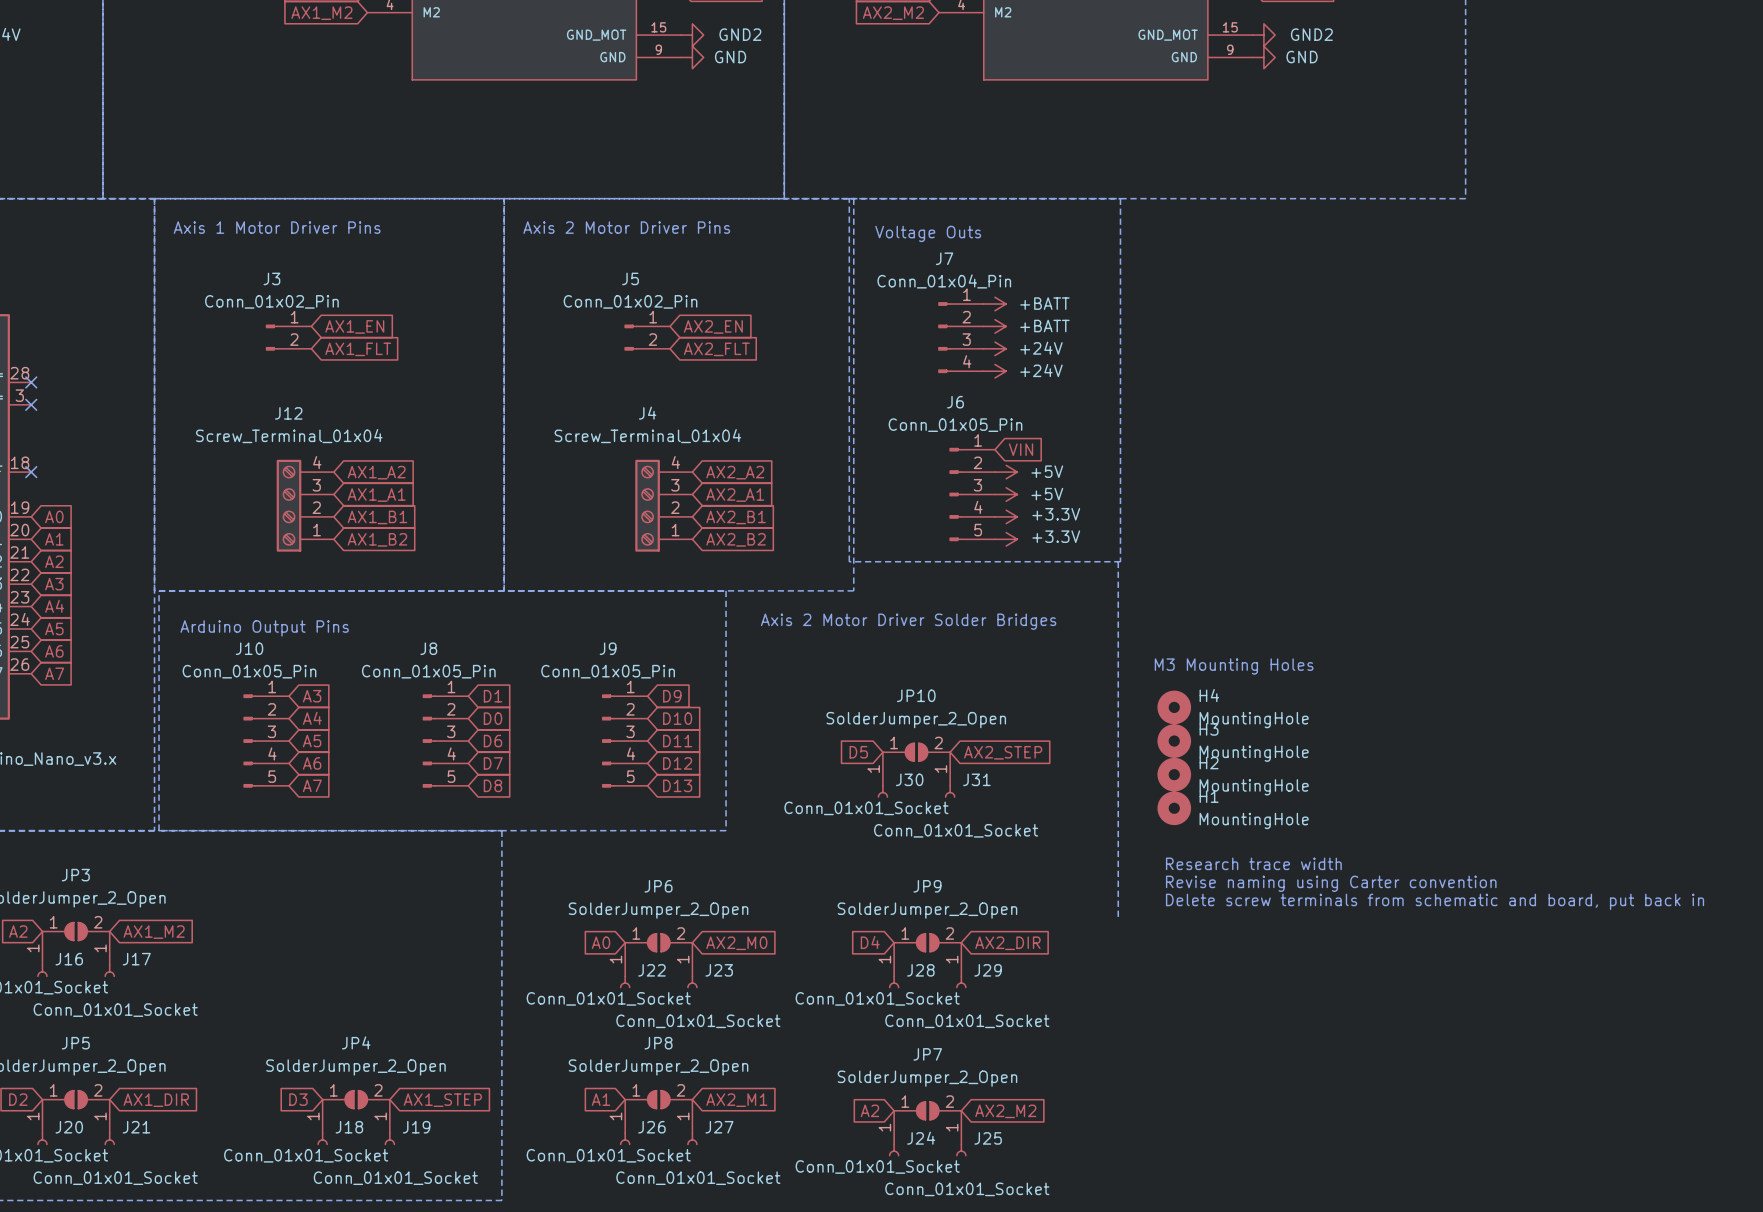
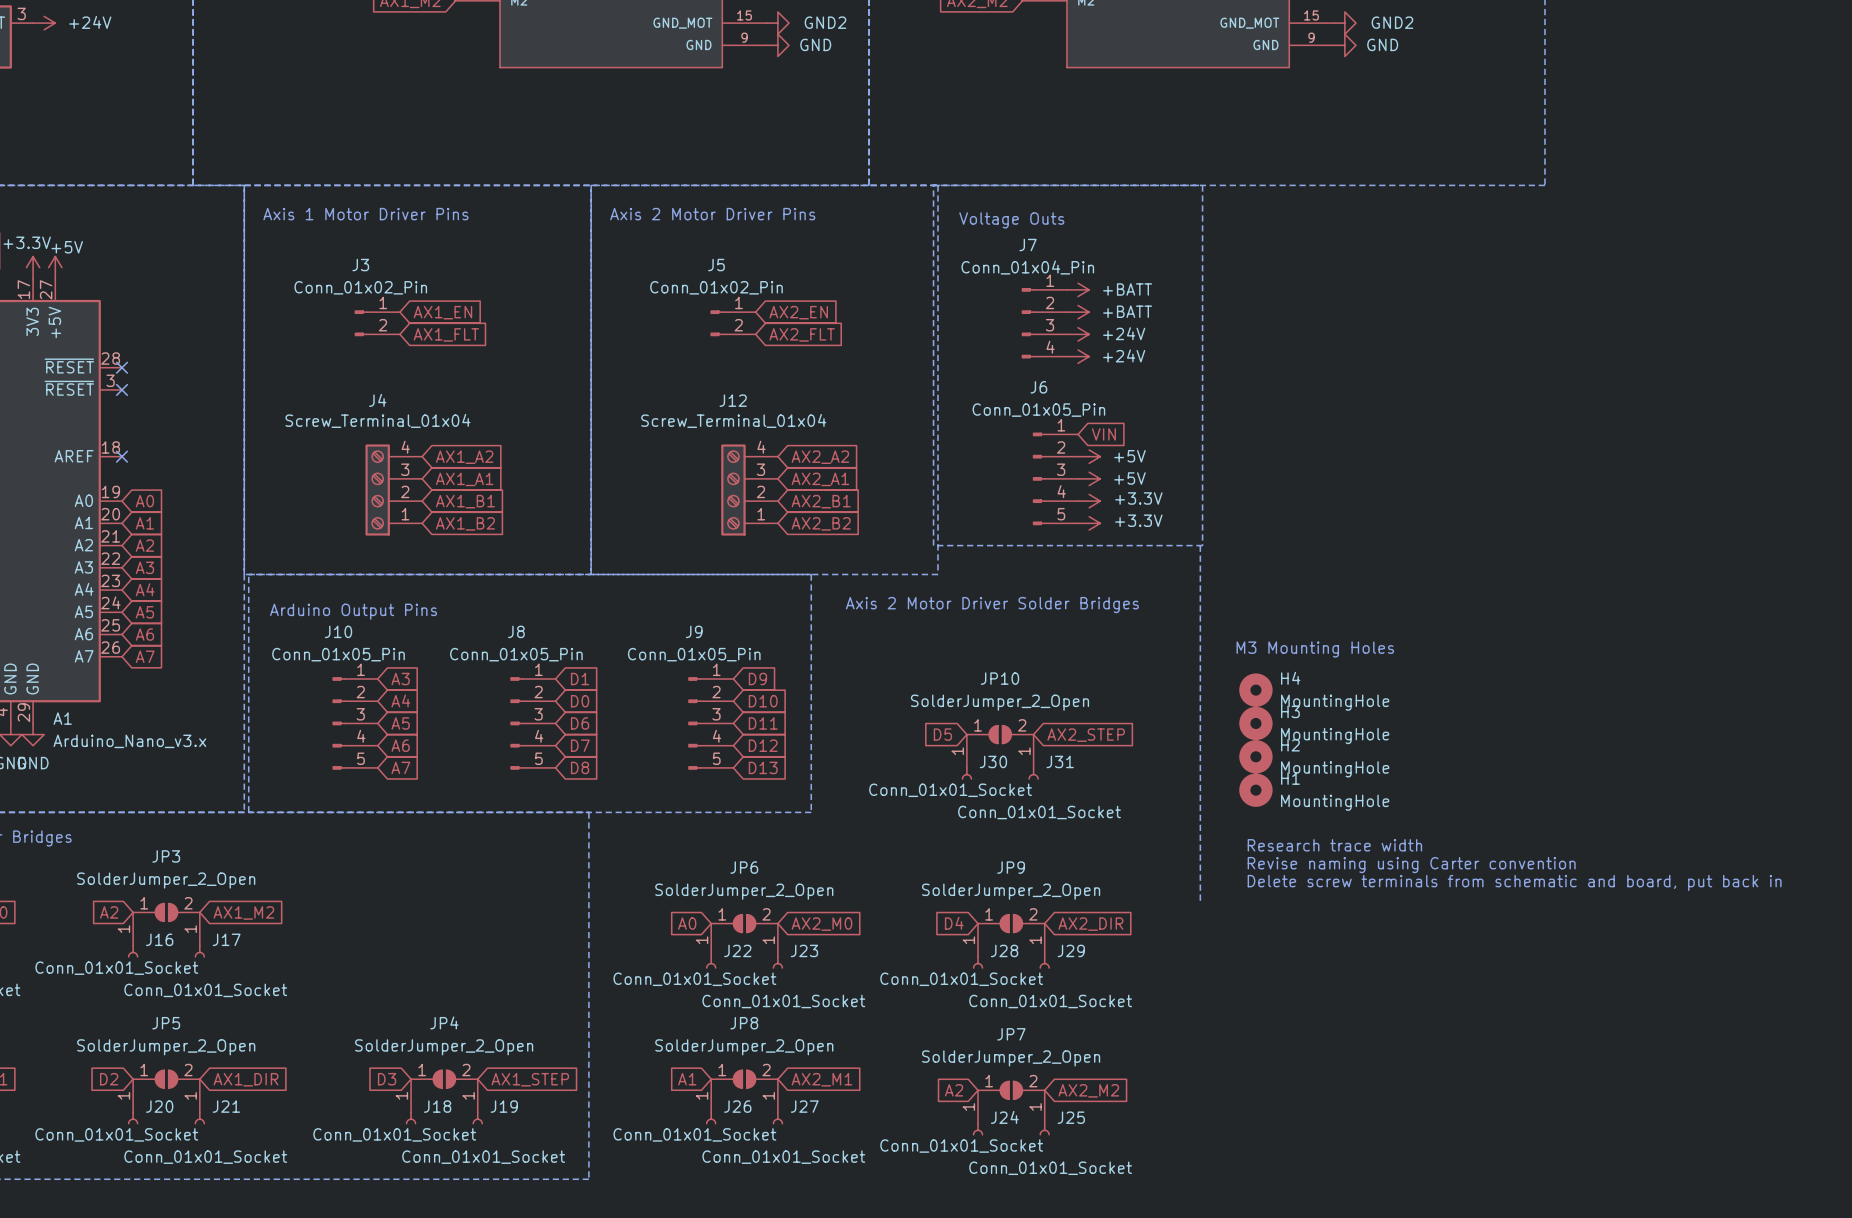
J12 name: J12 (288, 413) -> J4 (377, 400)
J4 name: J4 (647, 413) -> J12 (733, 400)

